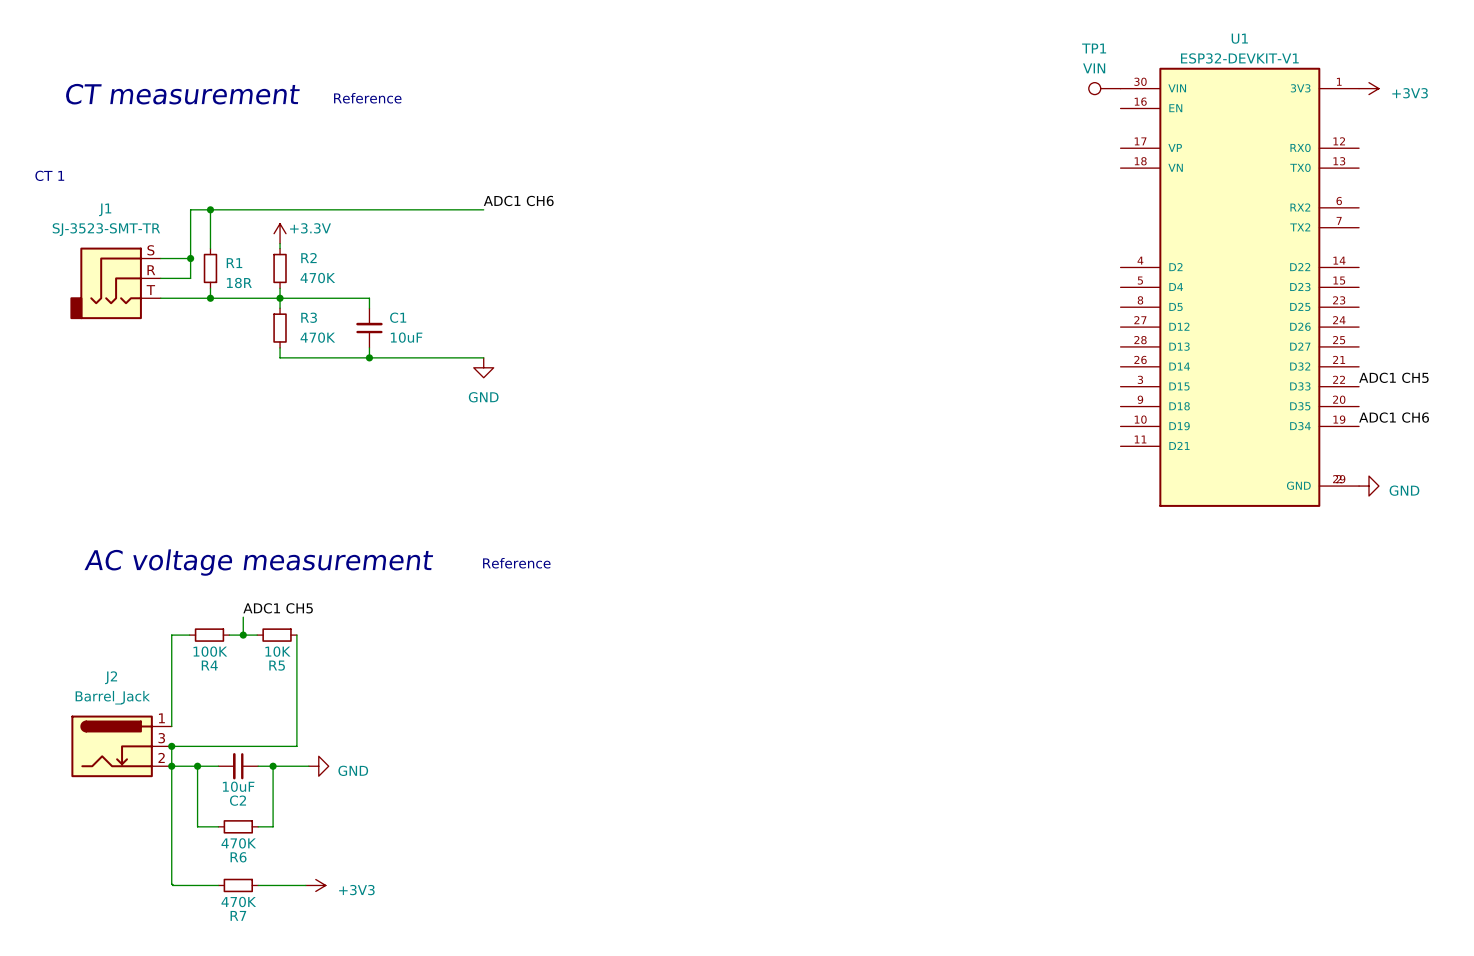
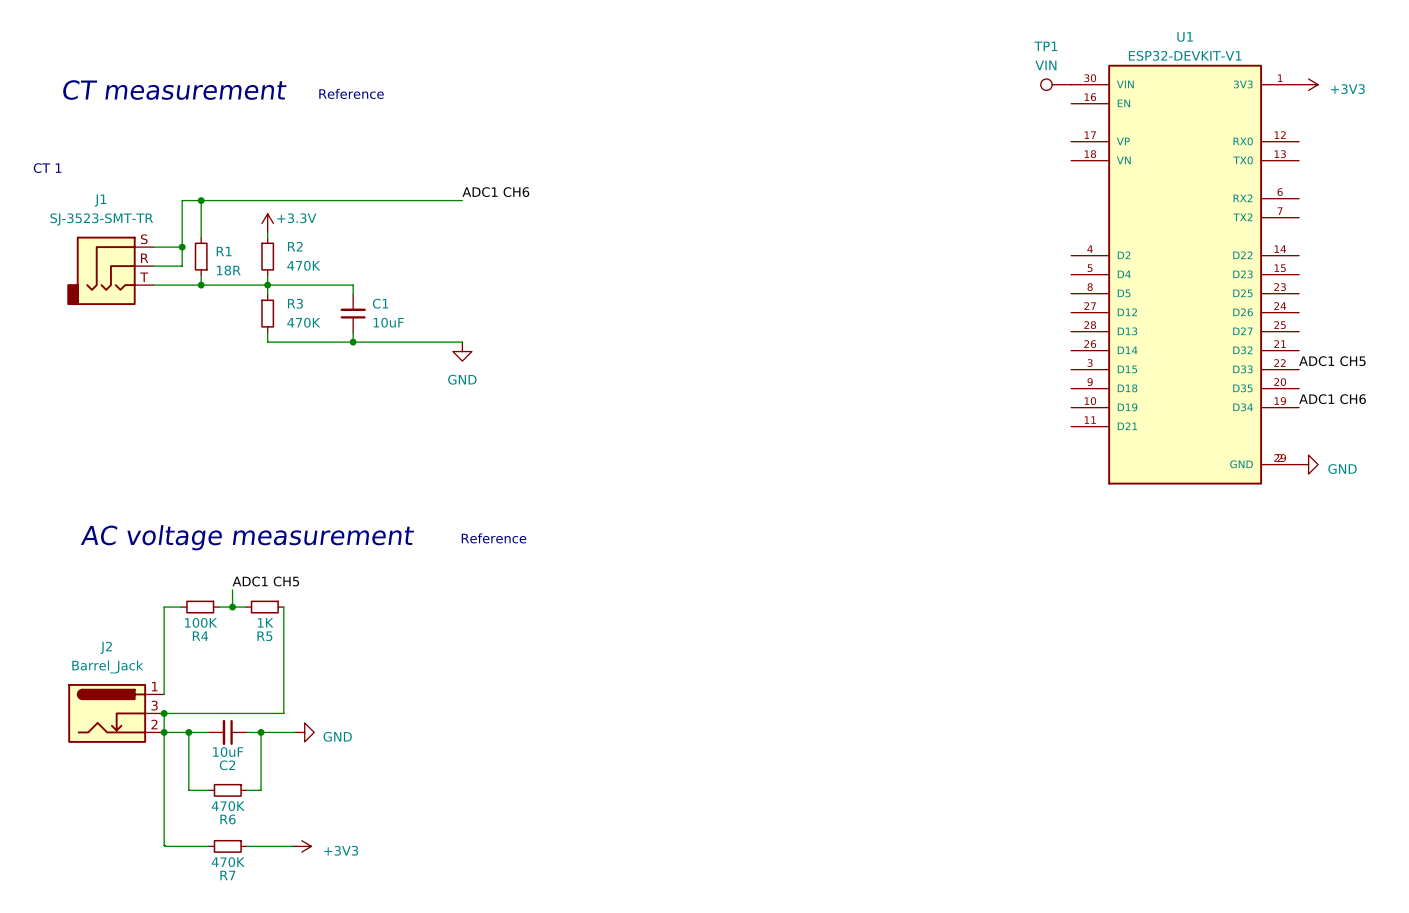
R5 value: 10K (277, 651) -> 1K (265, 622)

